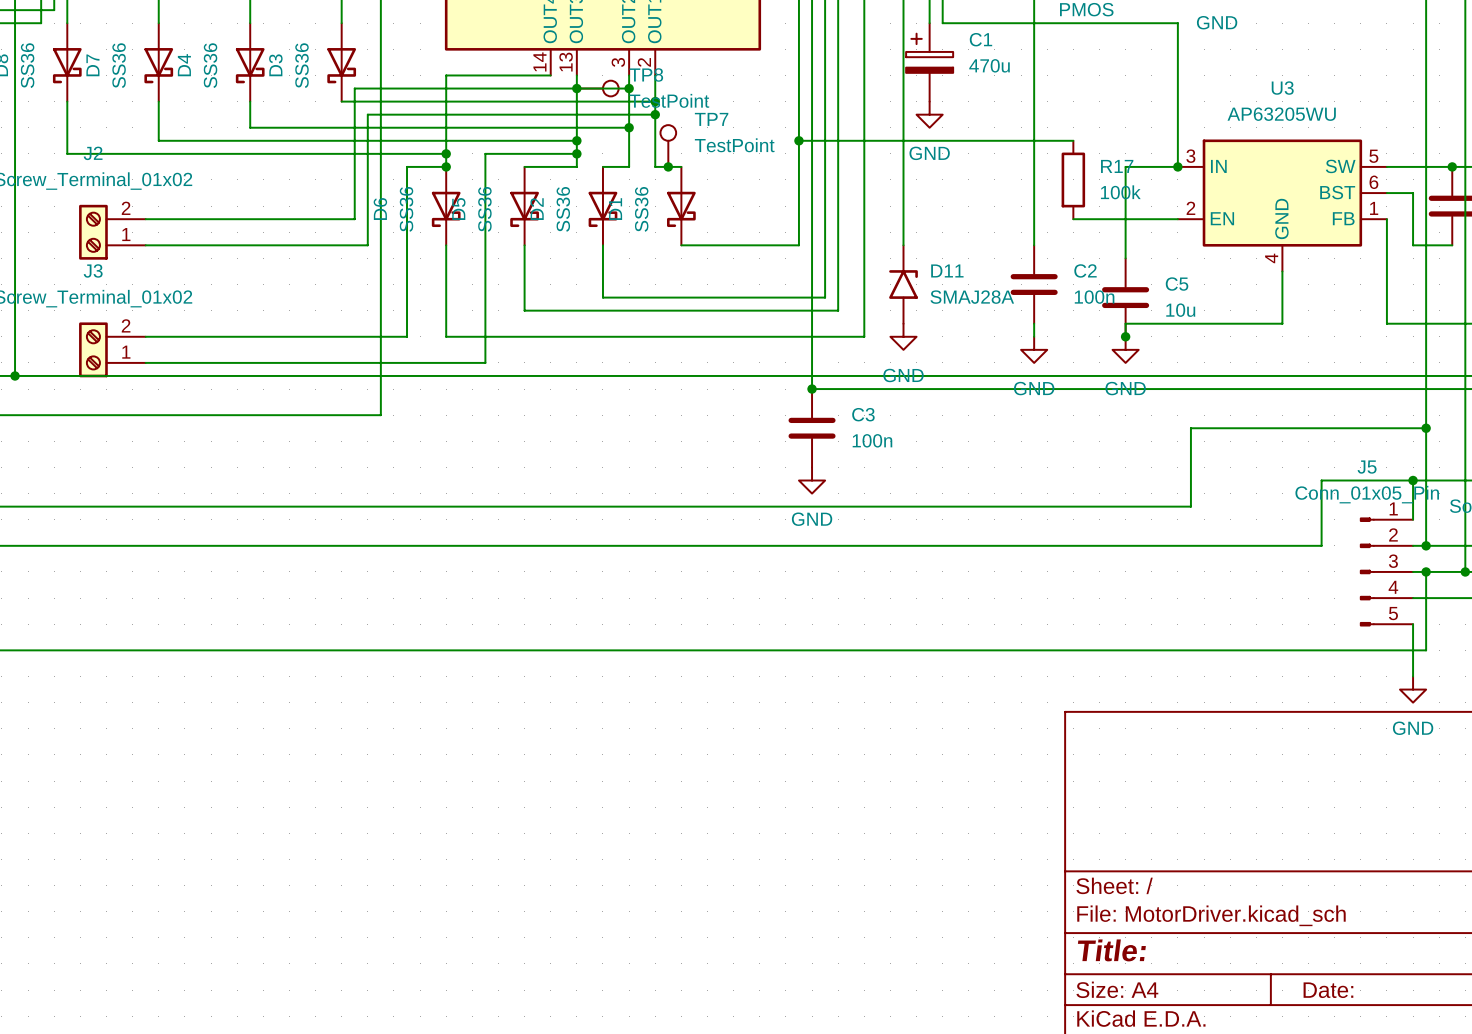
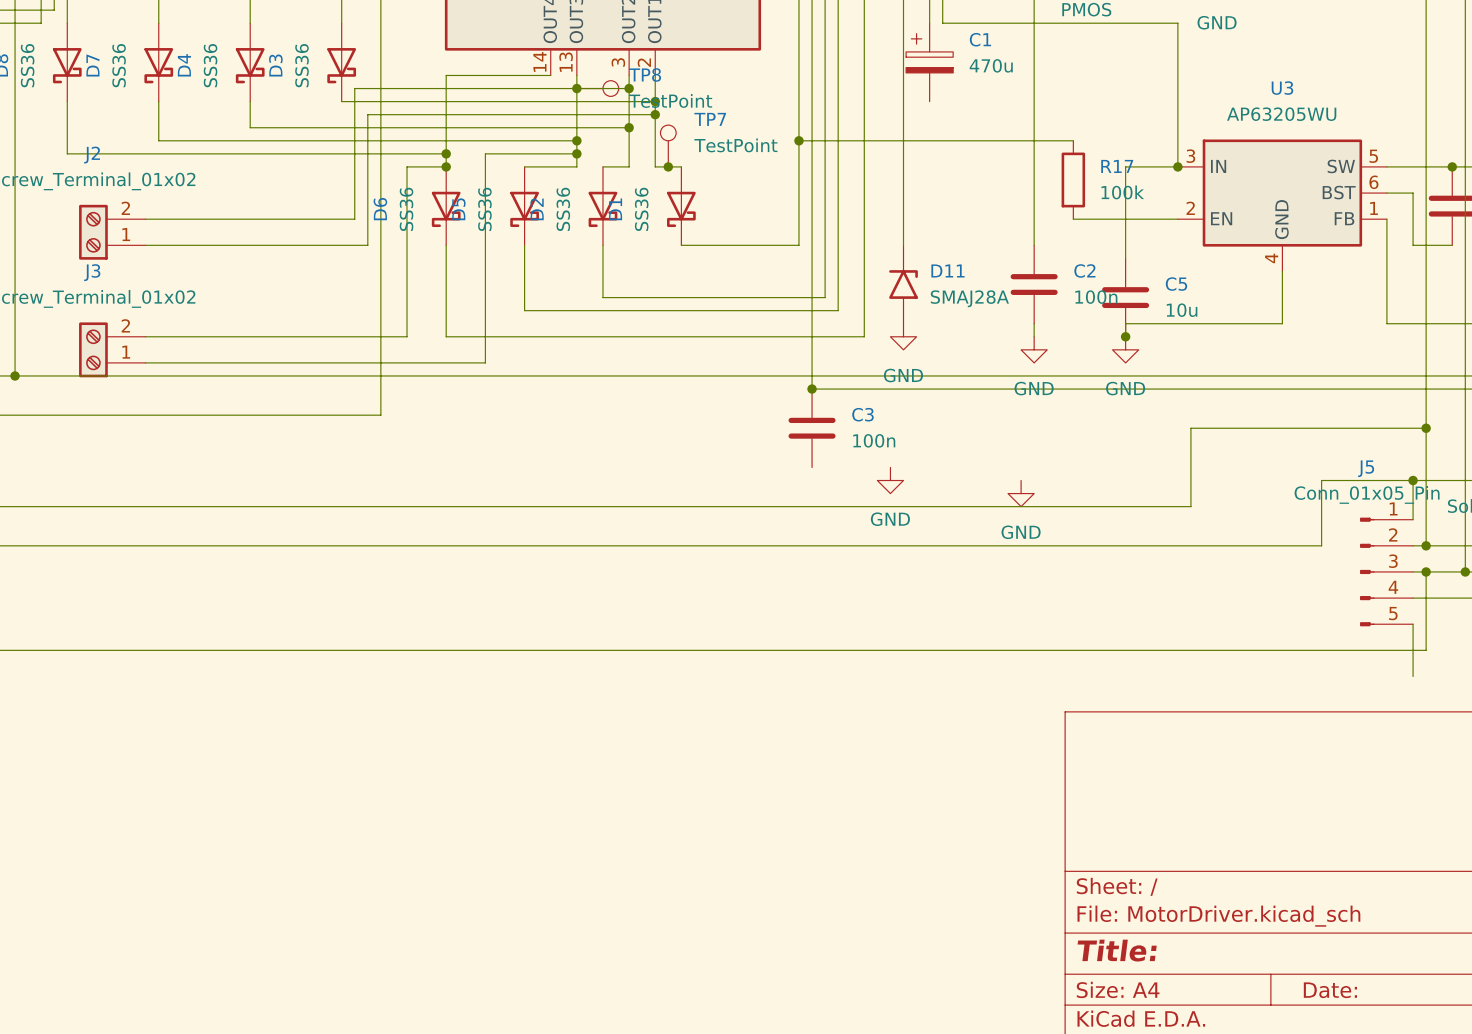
power symbol: GND (929, 114) -> none
power symbol position: GND (812, 480) -> GND (890, 480)
power symbol: none -> GND (1021, 493)
power symbol: GND (1413, 689) -> none

